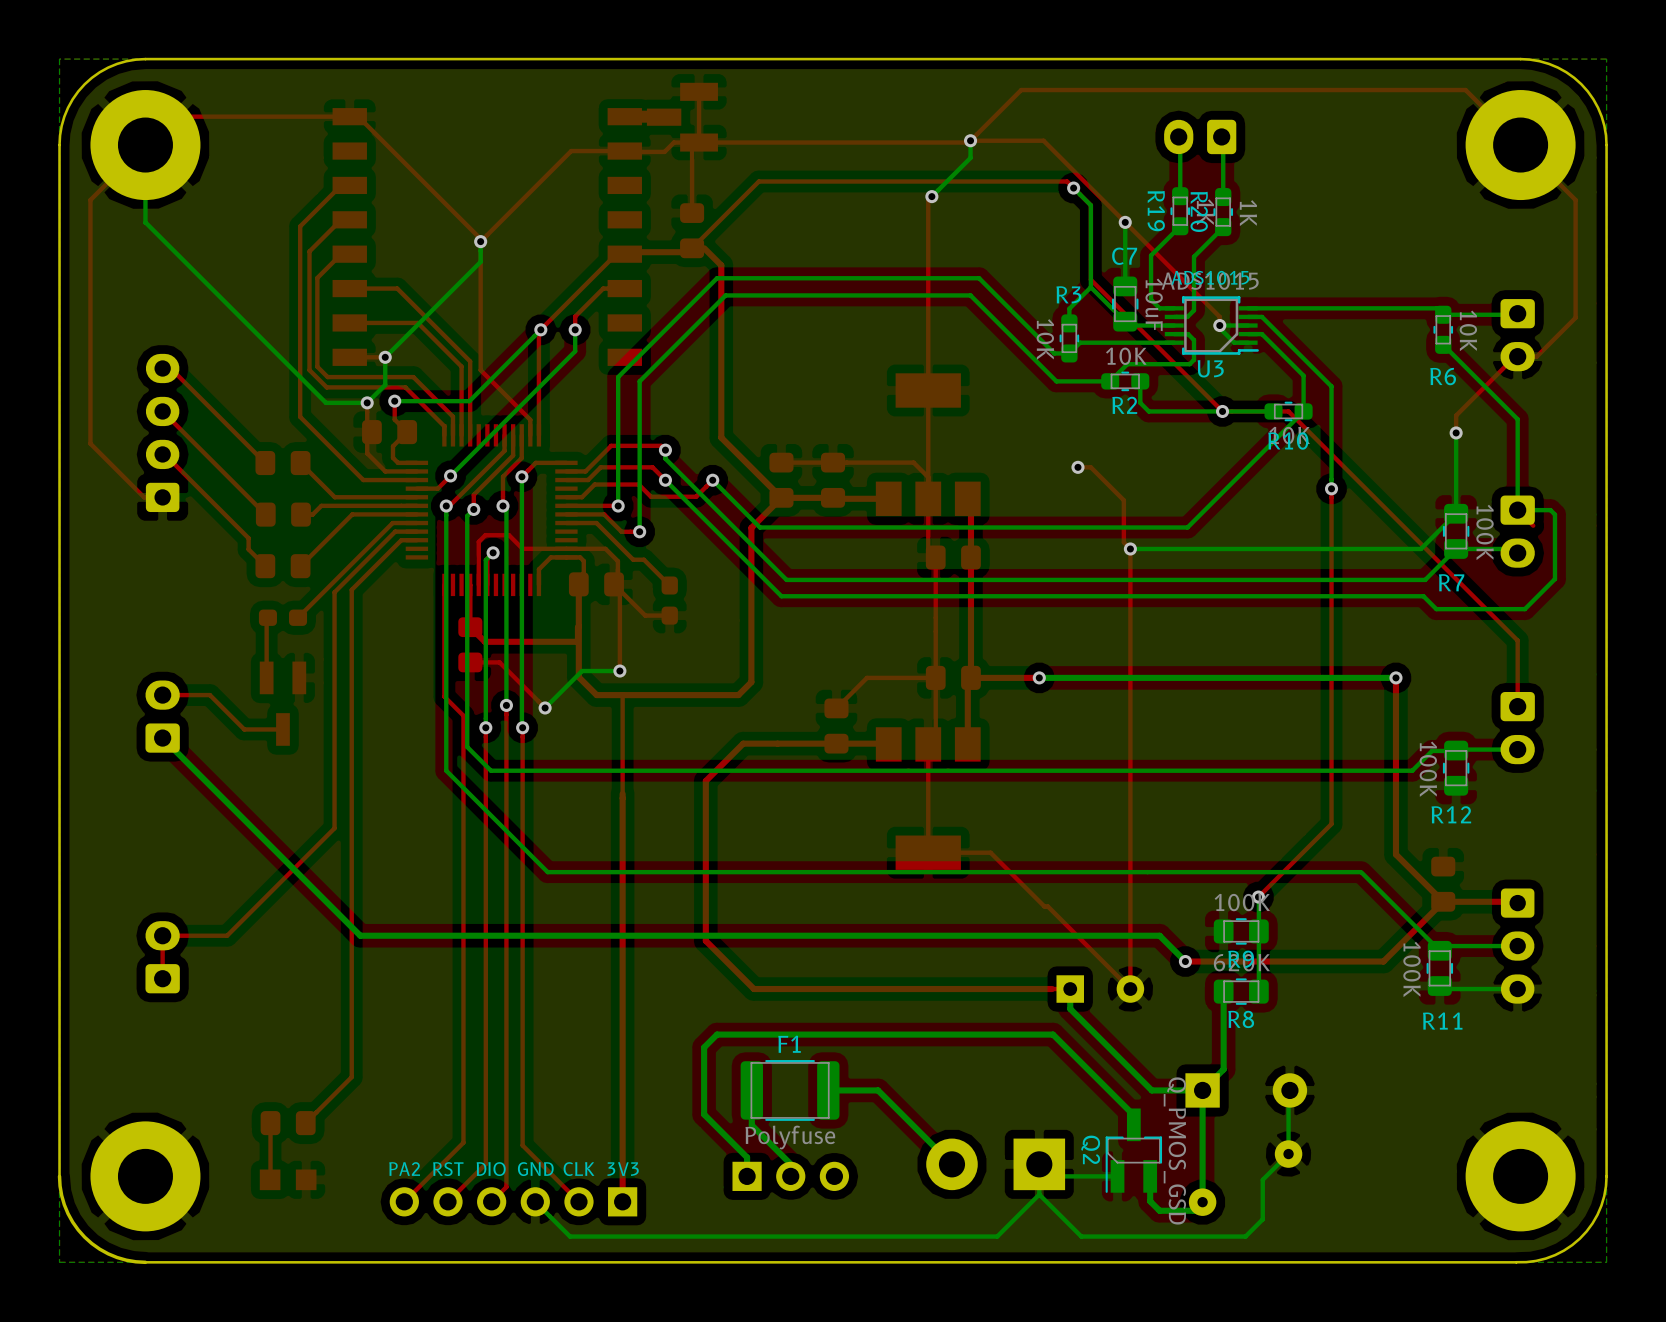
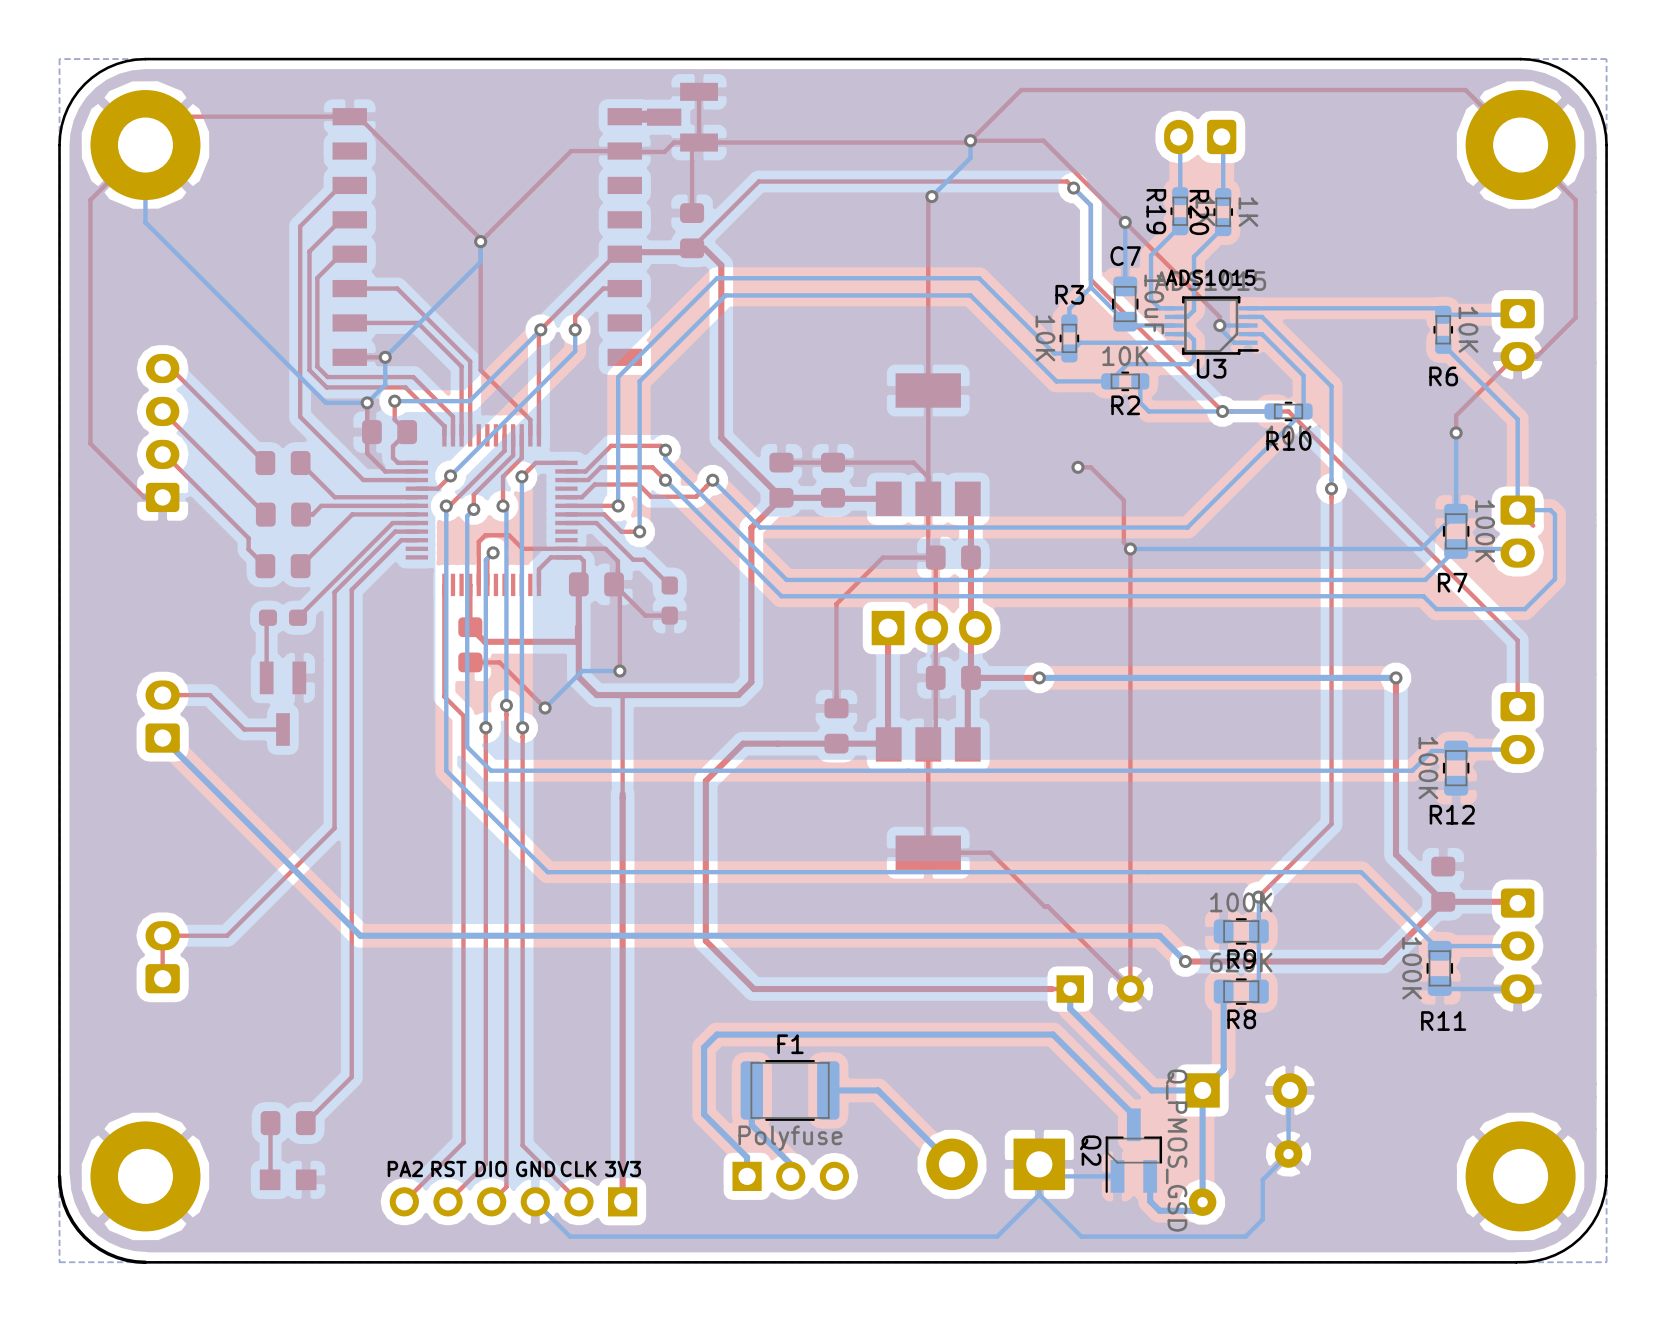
top track: none -> (888, 628) (888, 744)
part: none -> (931, 628)
top track: (935, 677) (866, 677) (836, 708) -> (935, 557) (882, 557) (836, 603) (836, 708)

